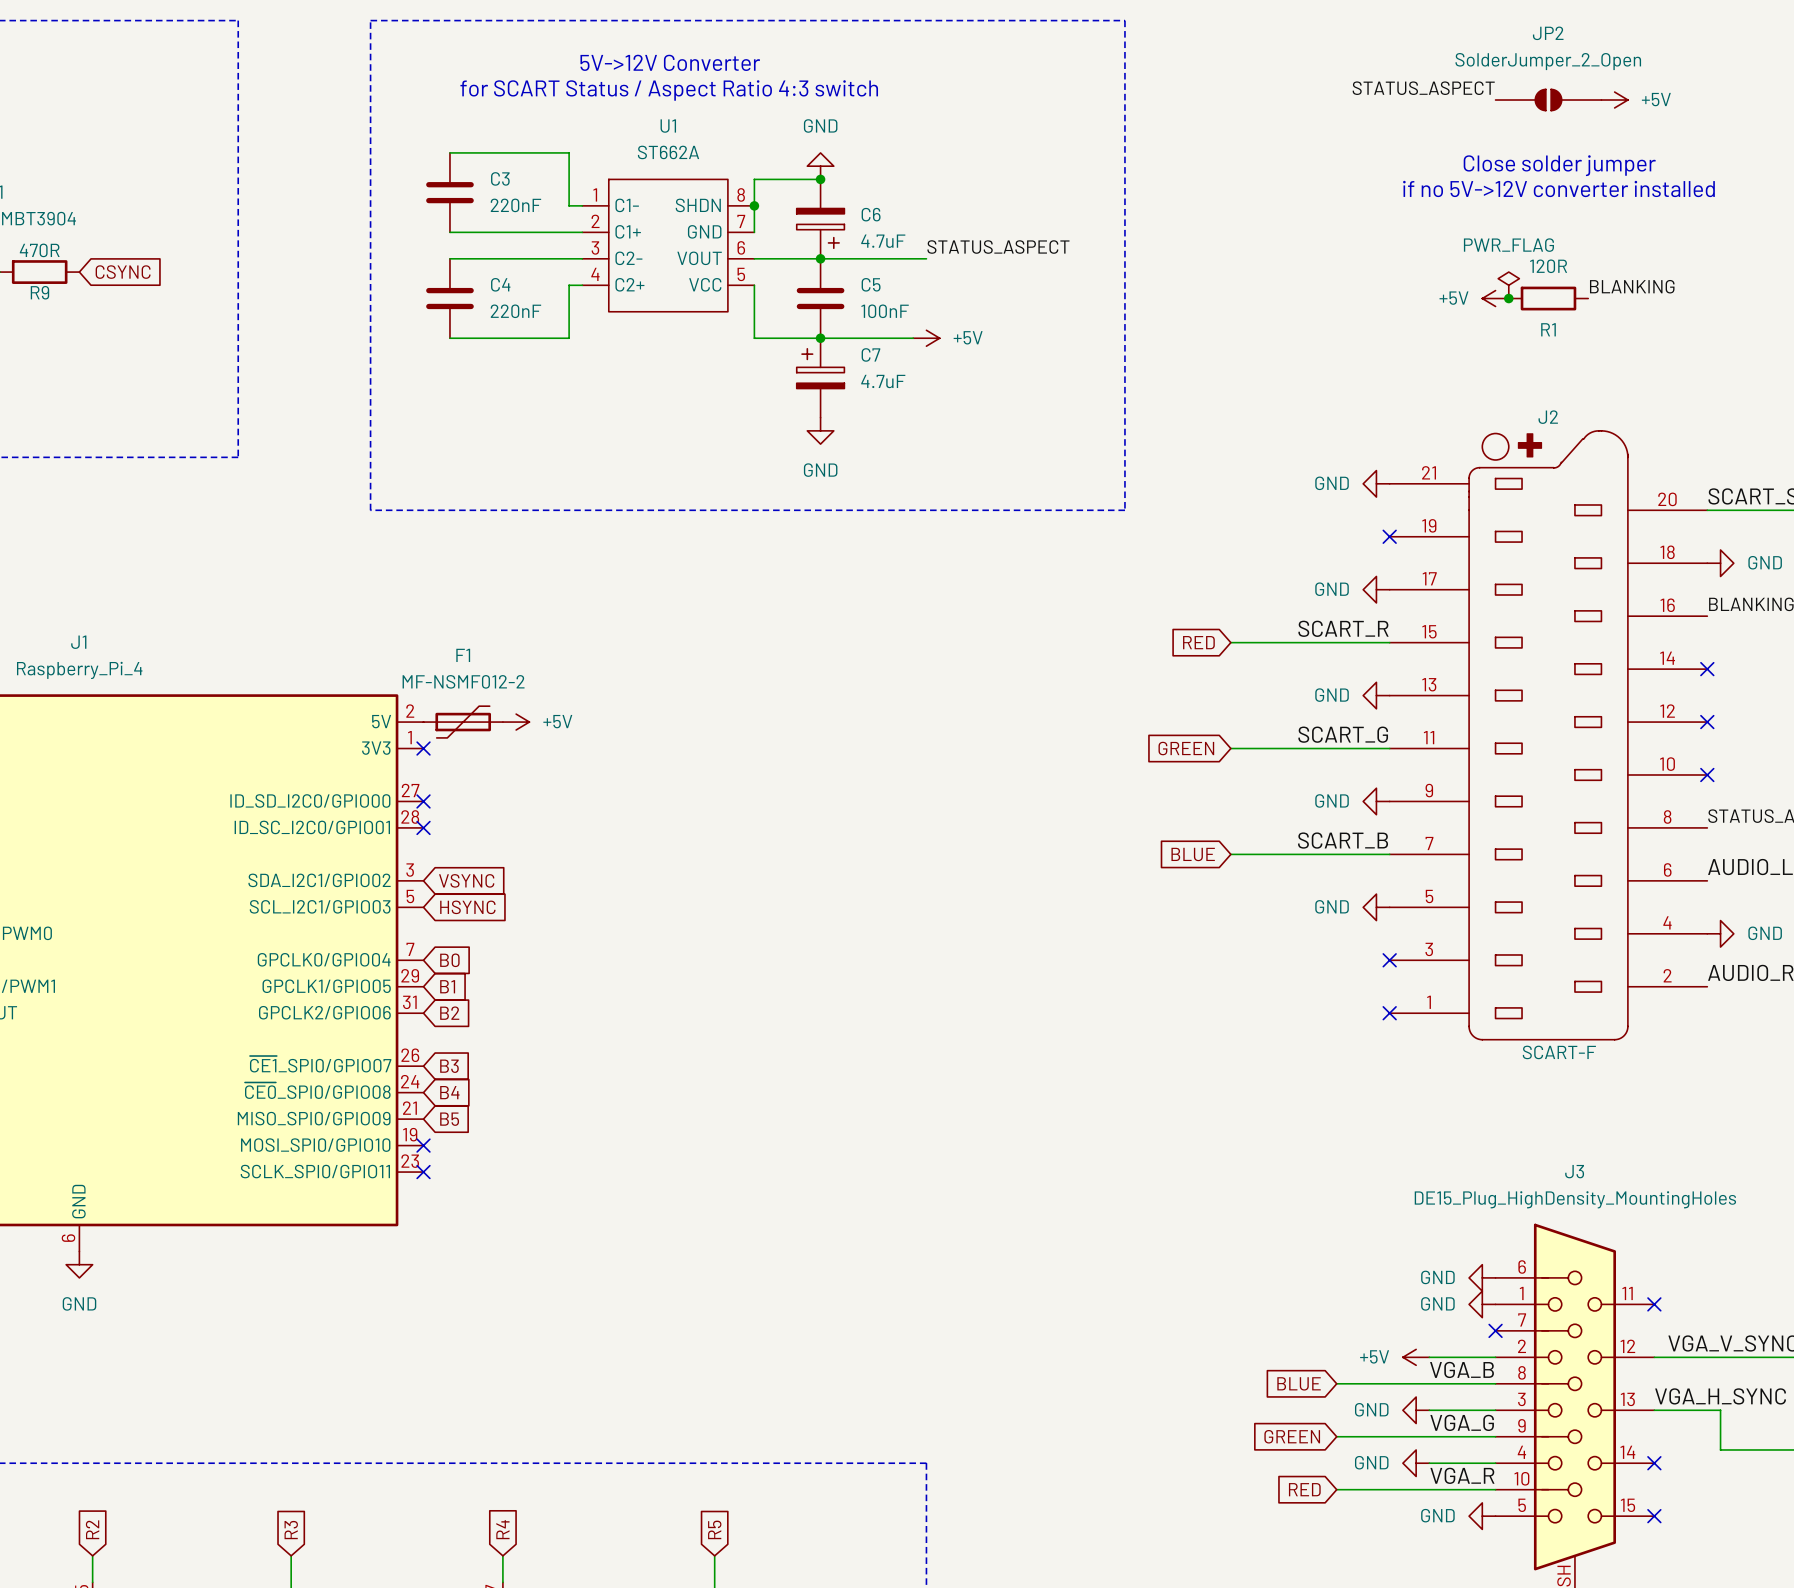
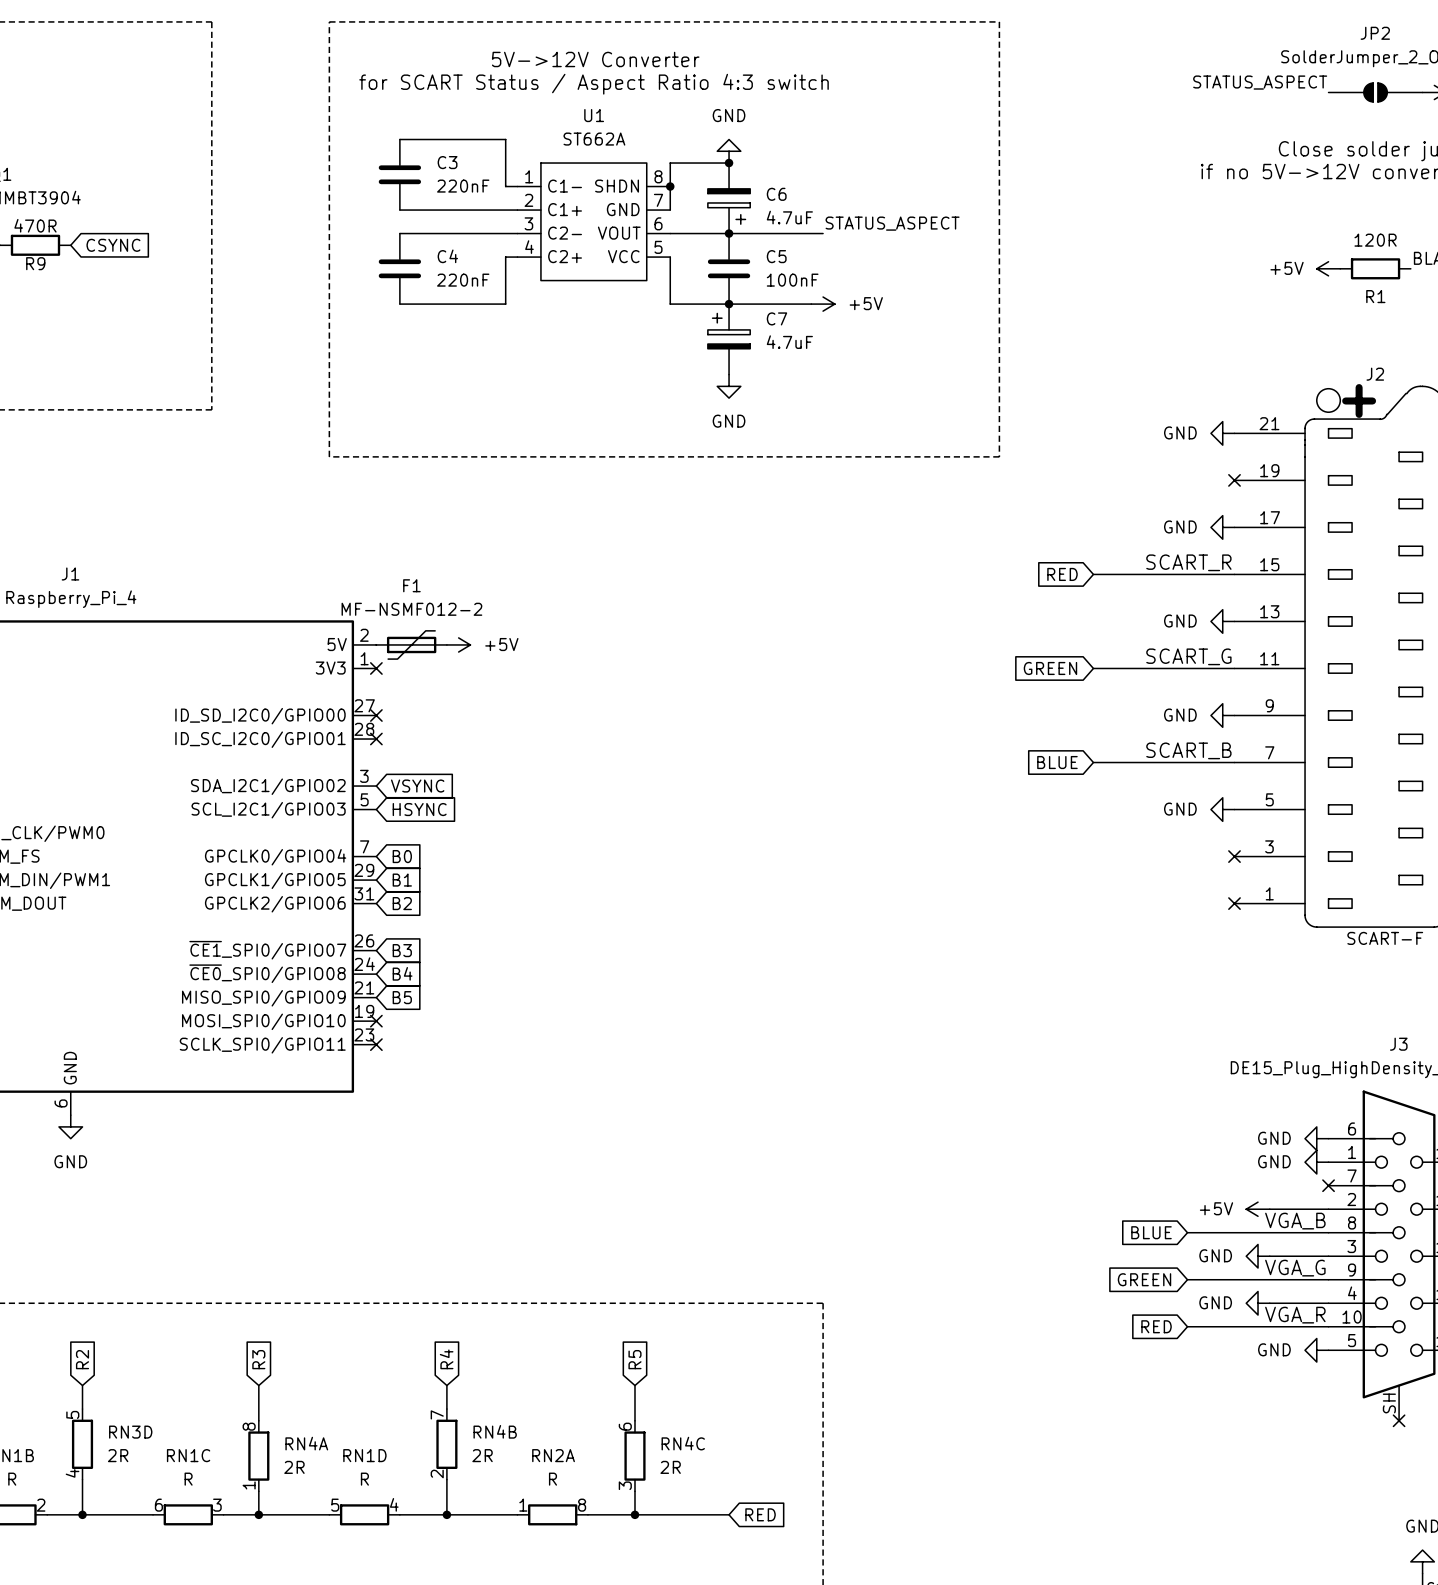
power symbol: PWR_FLAG (1508, 285) -> none
junction: (1508, 298) -> none

